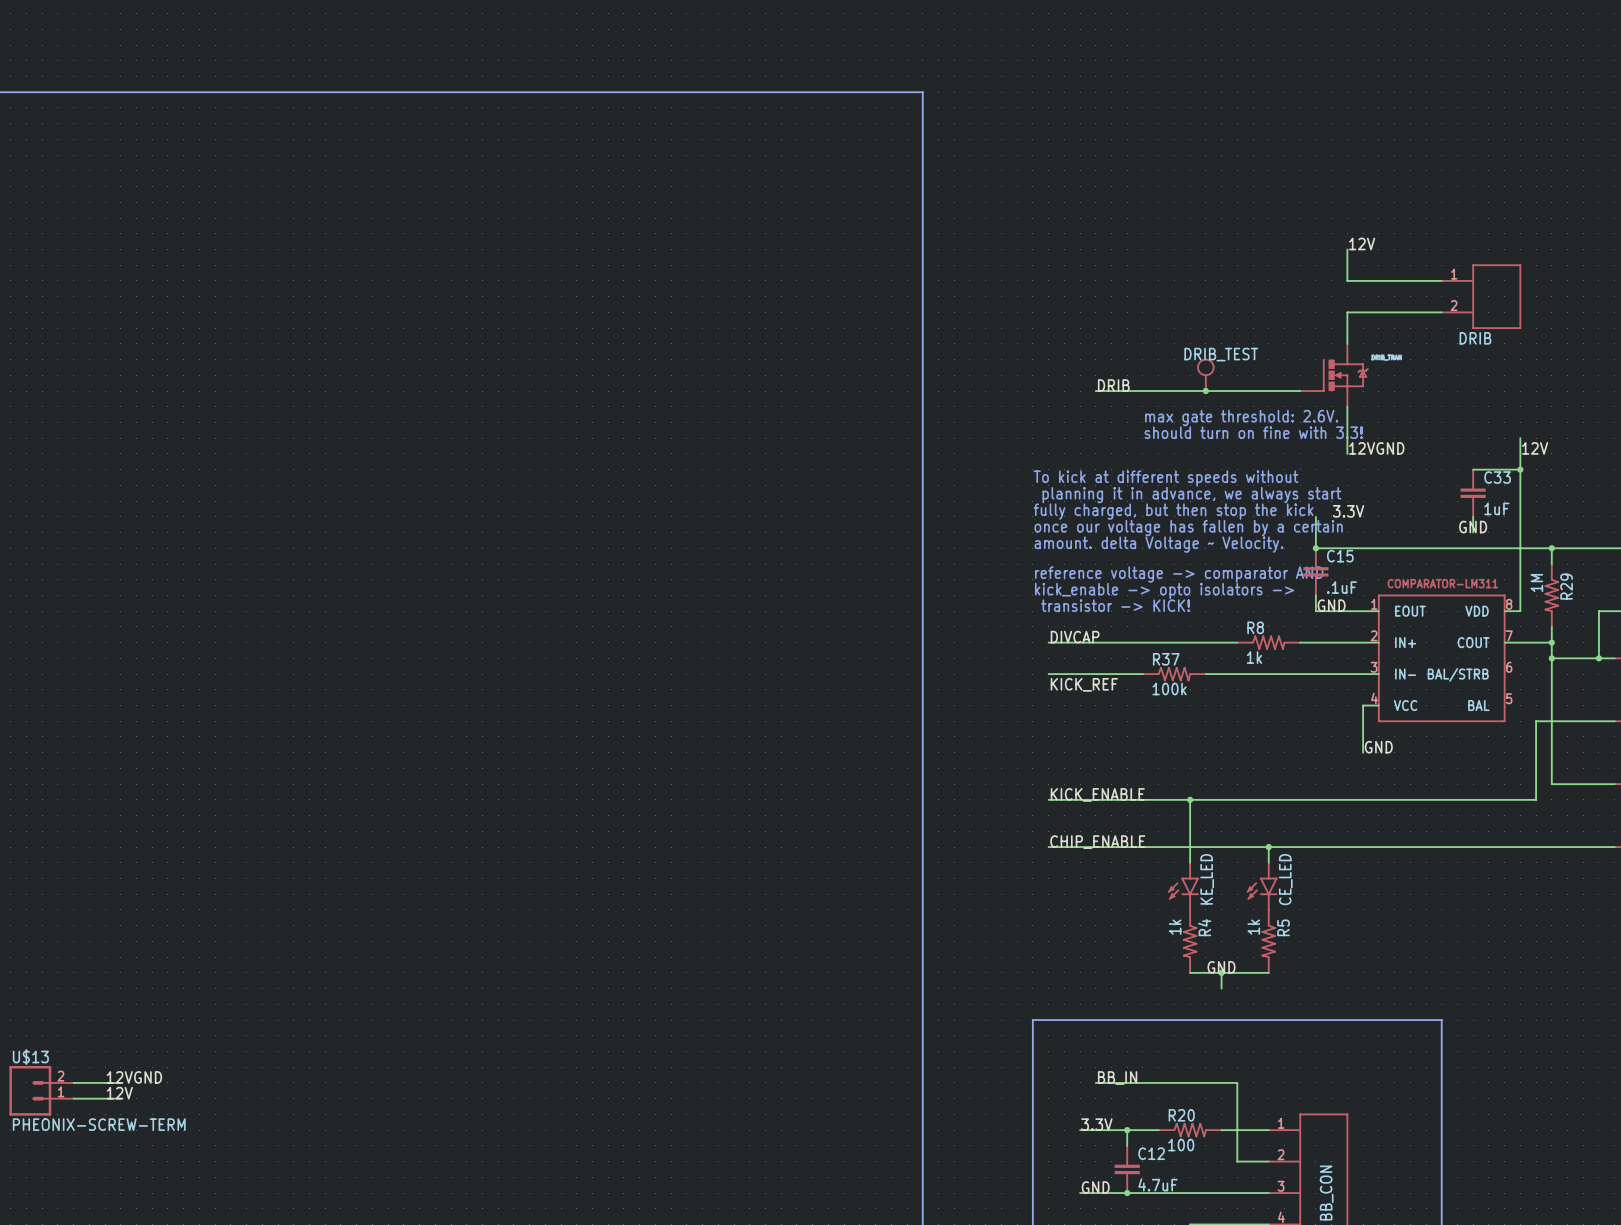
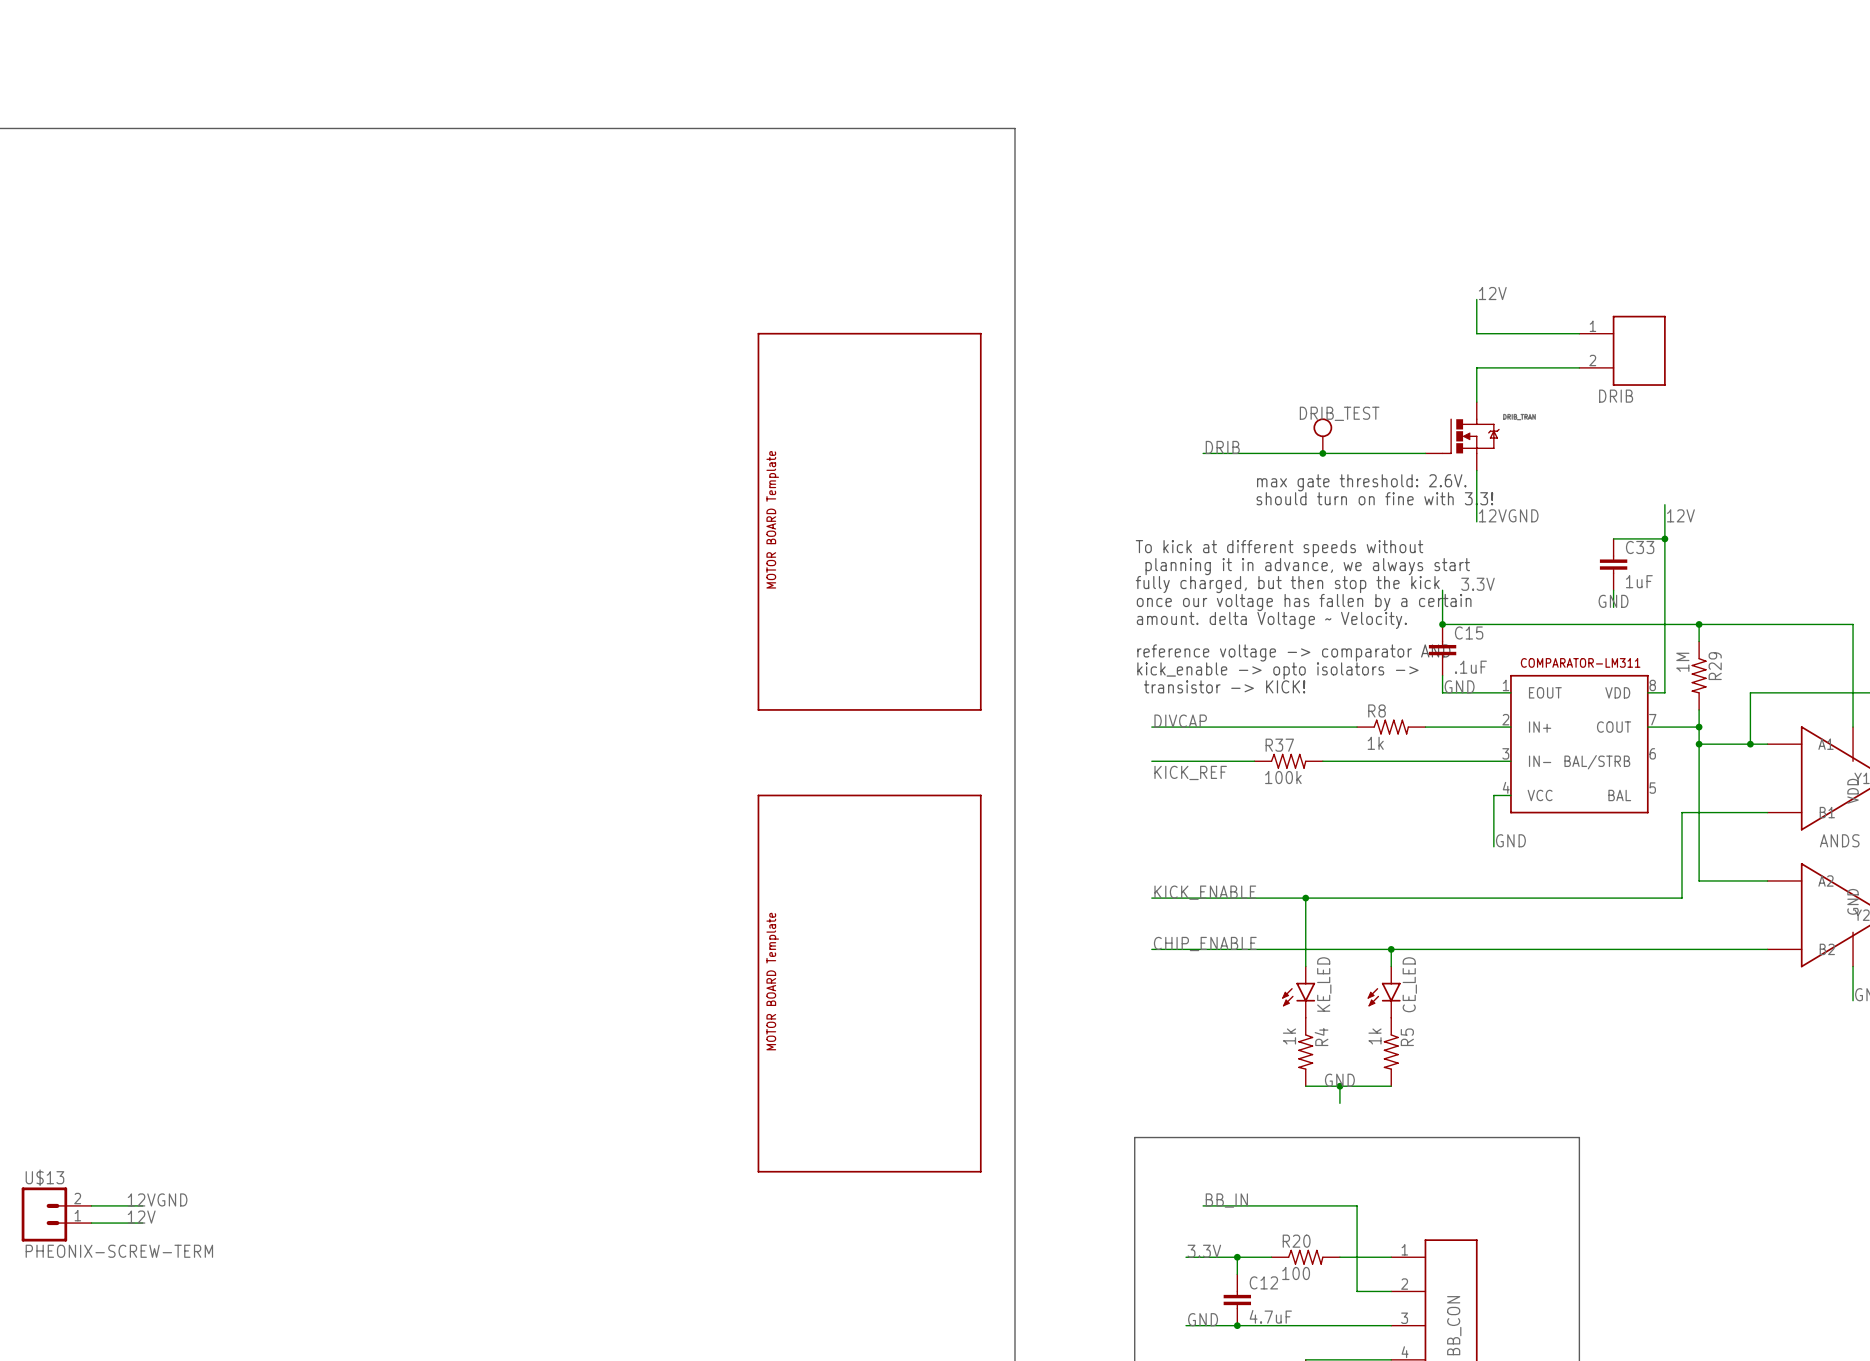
part: none -> (869, 521)
part: none -> (869, 983)

